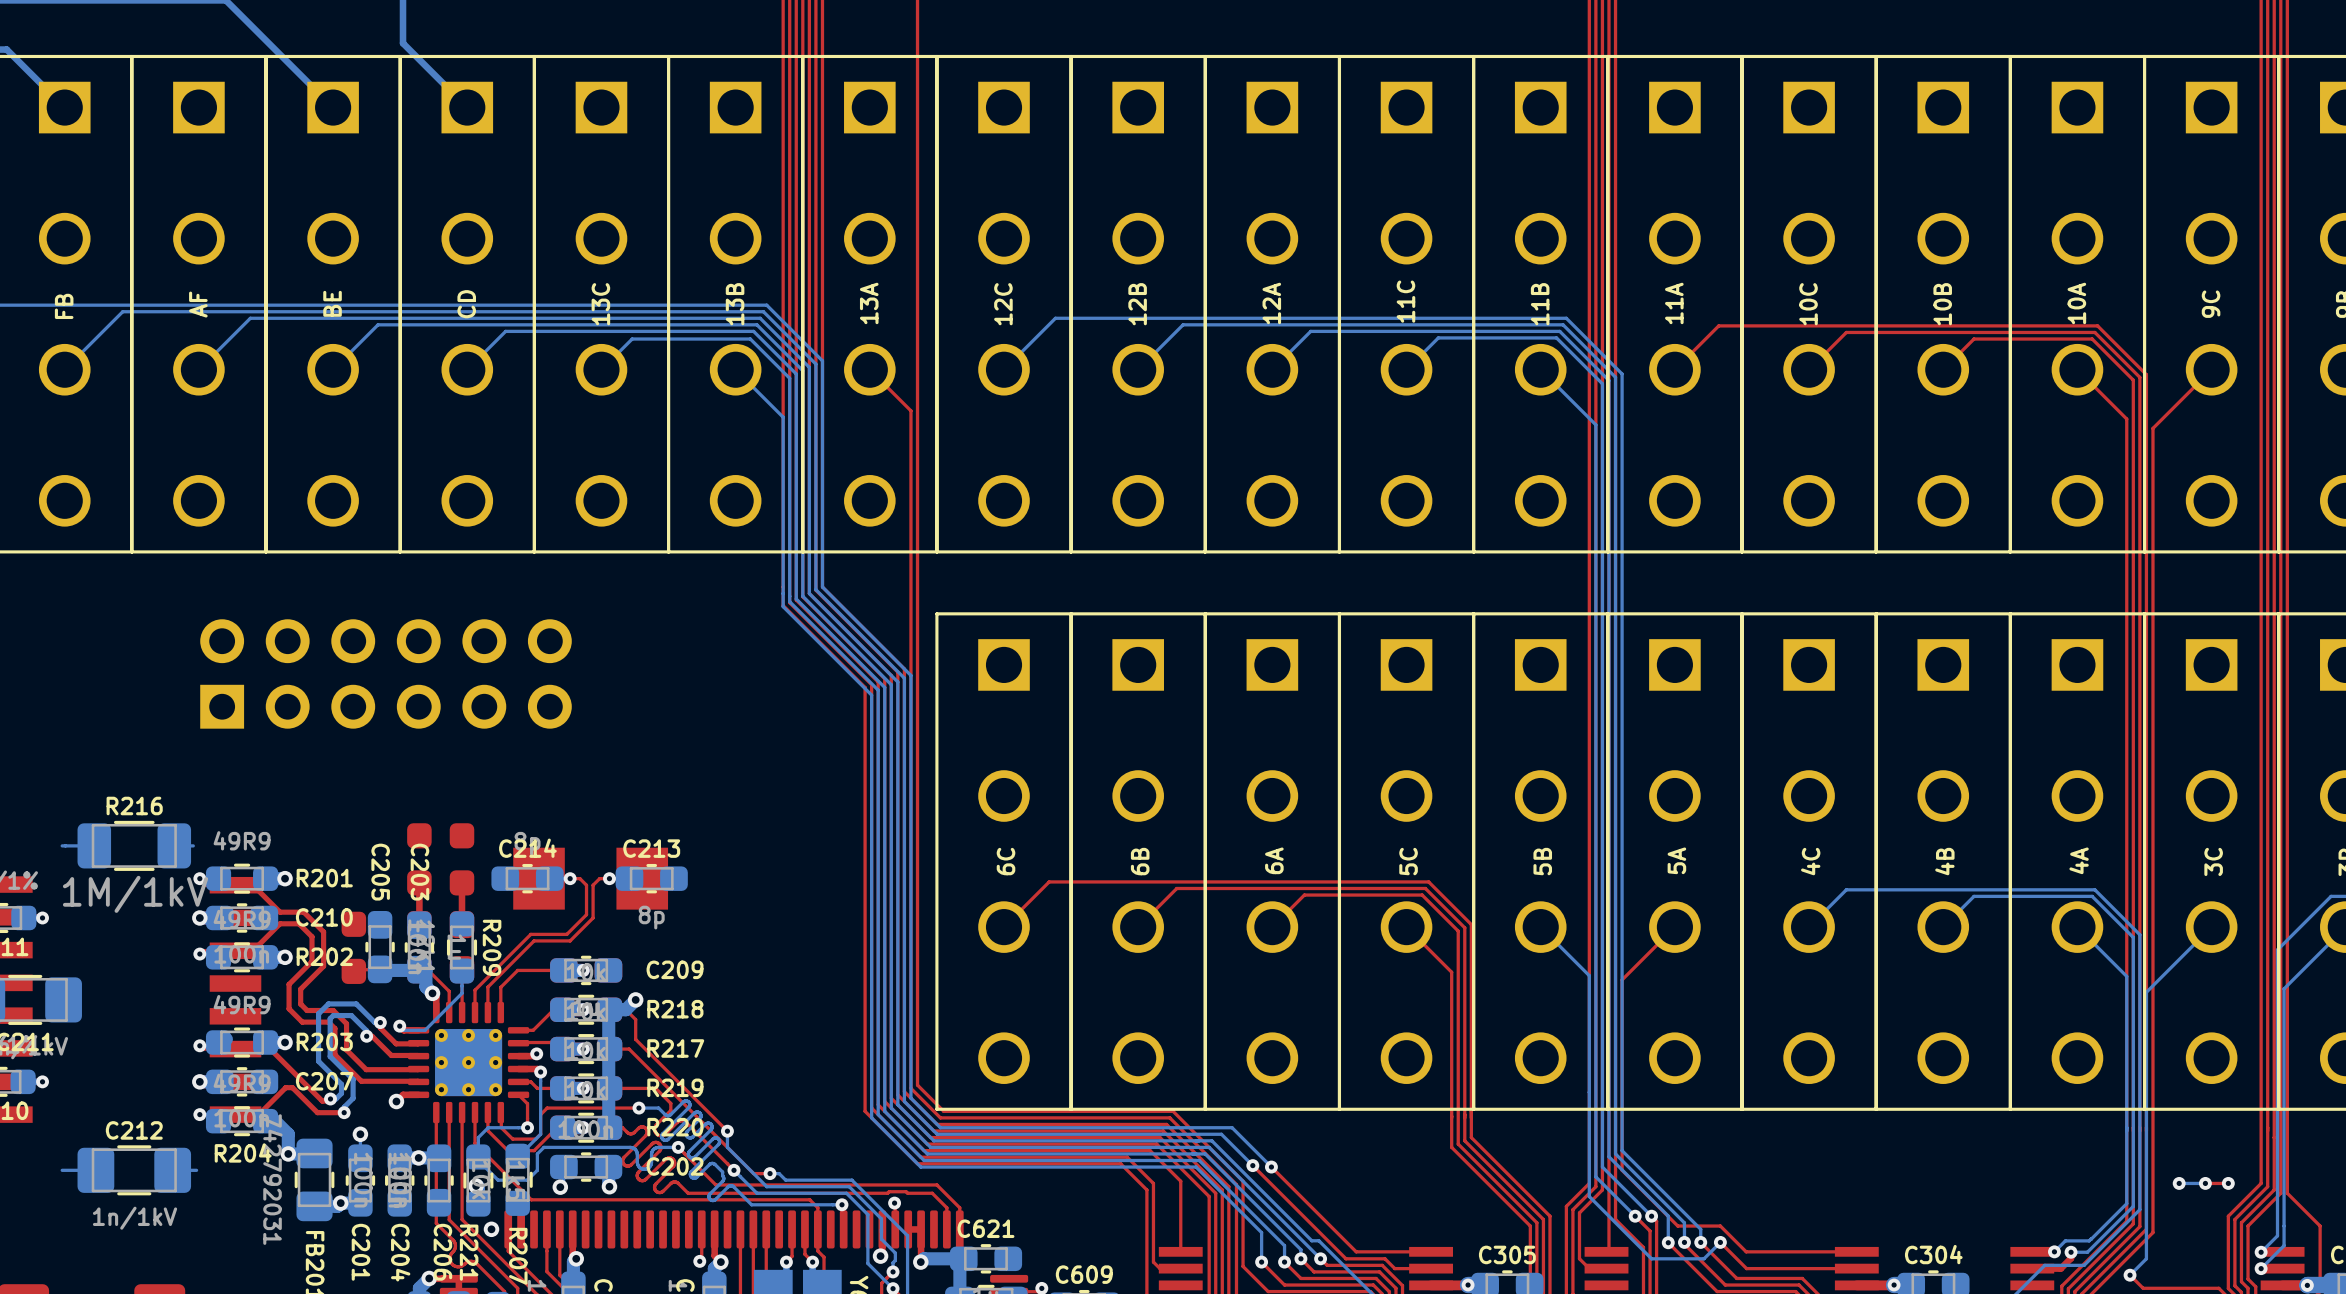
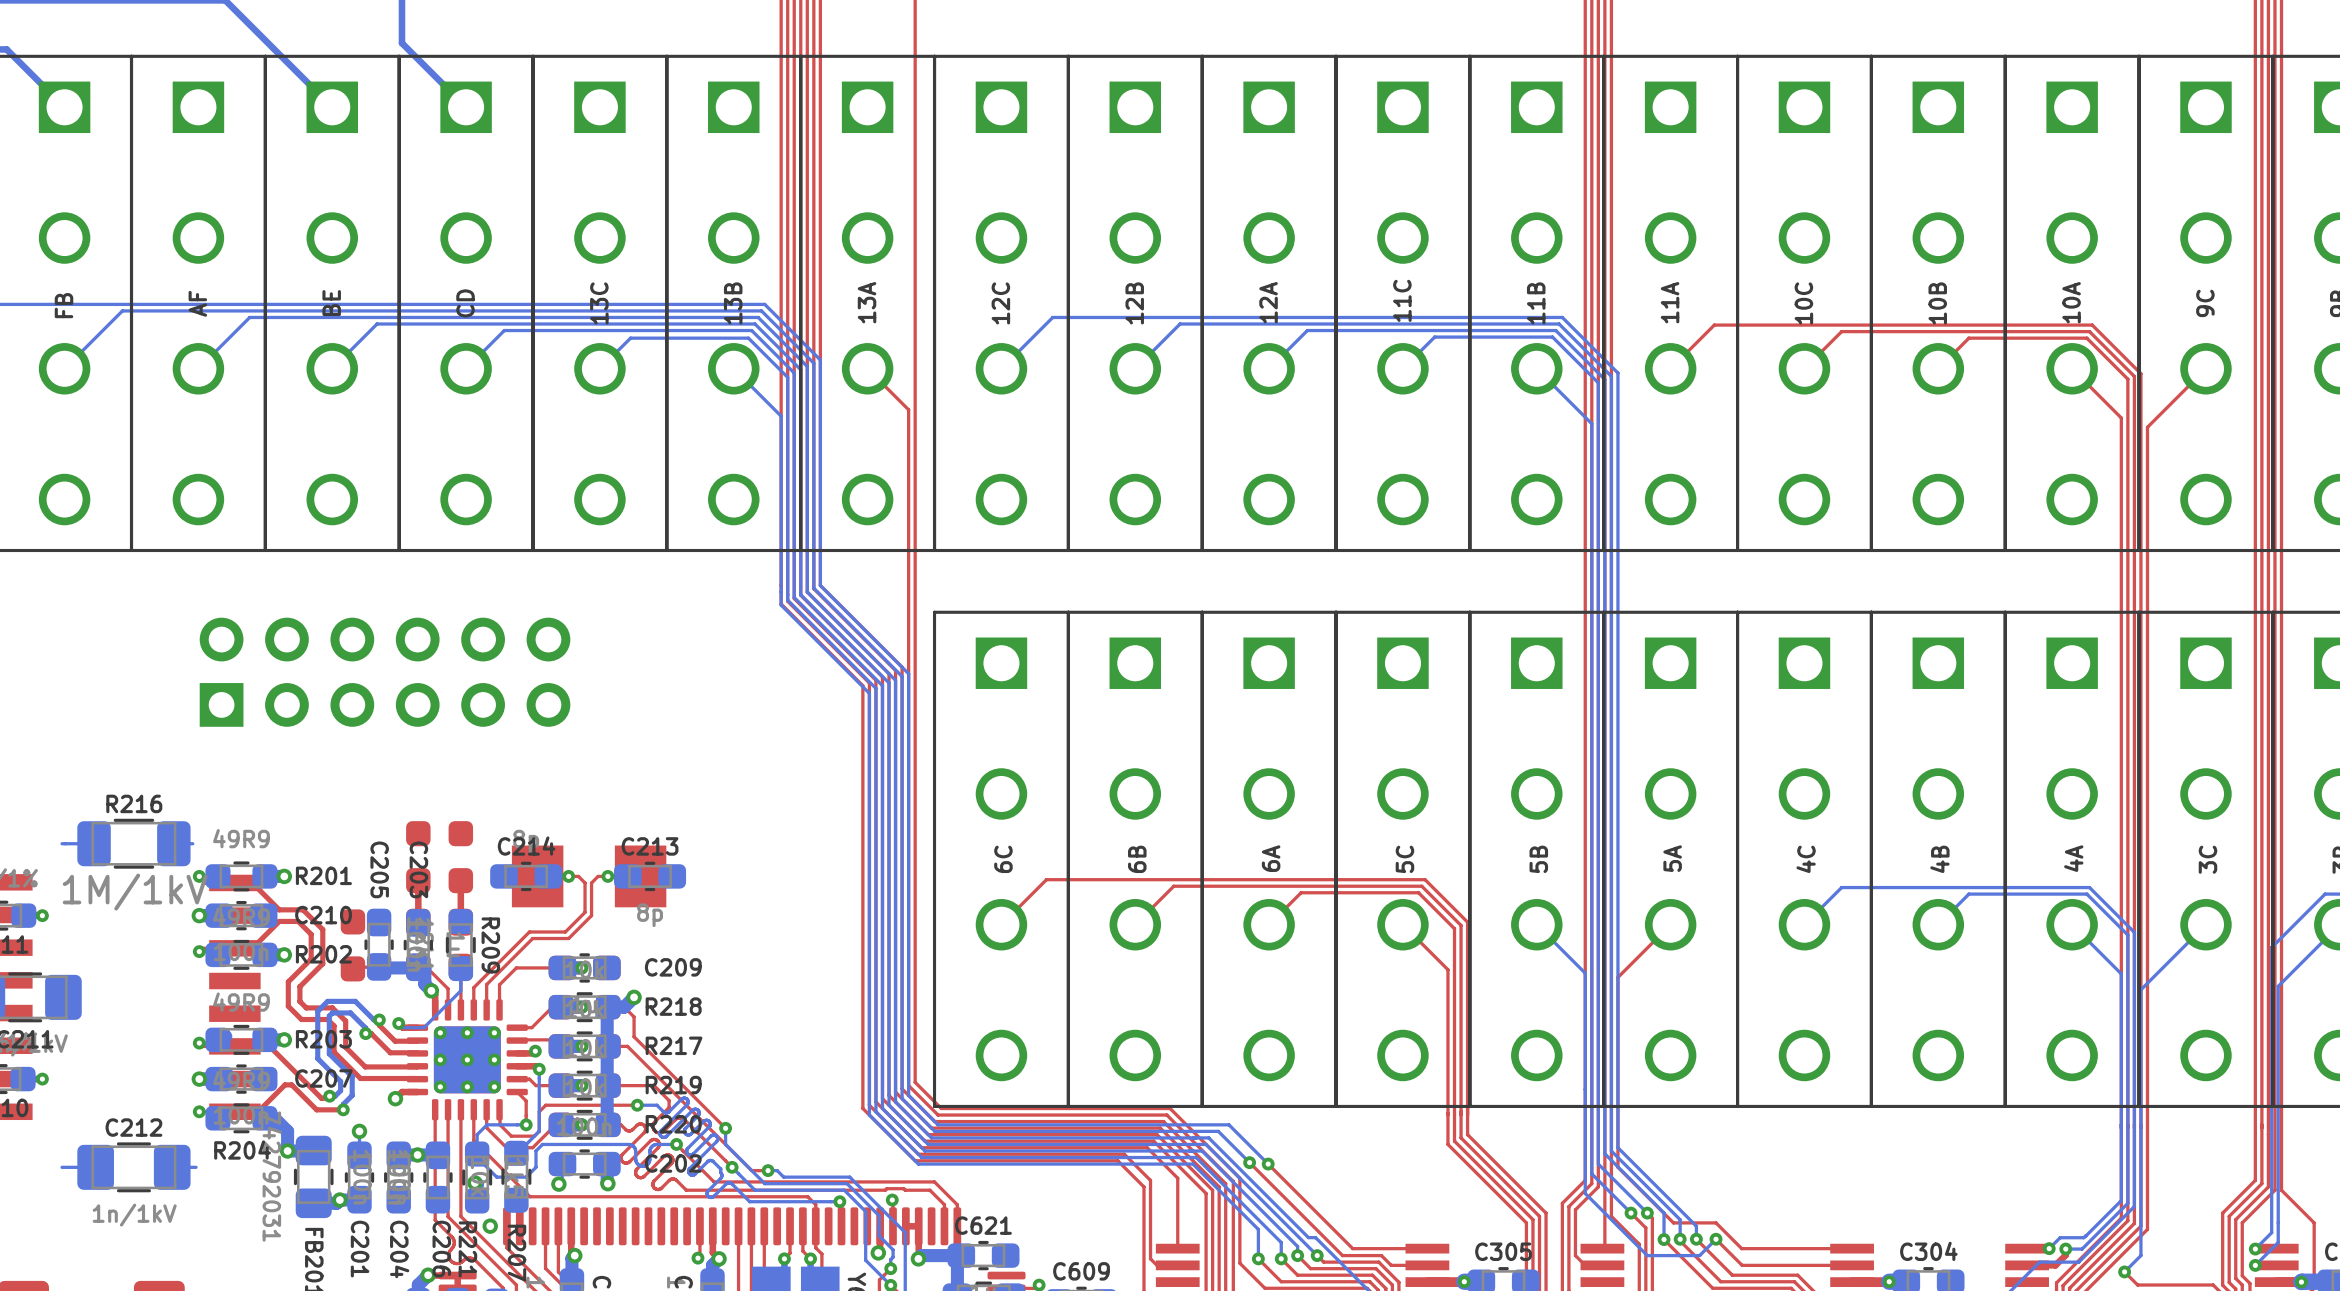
via: (2179, 1183) -> none
bottom track: (2205, 1183) (2179, 1183) -> none
via: (2205, 1183) -> none
top track: (2228, 1183) (2205, 1183) -> none
via: (2228, 1183) -> none

